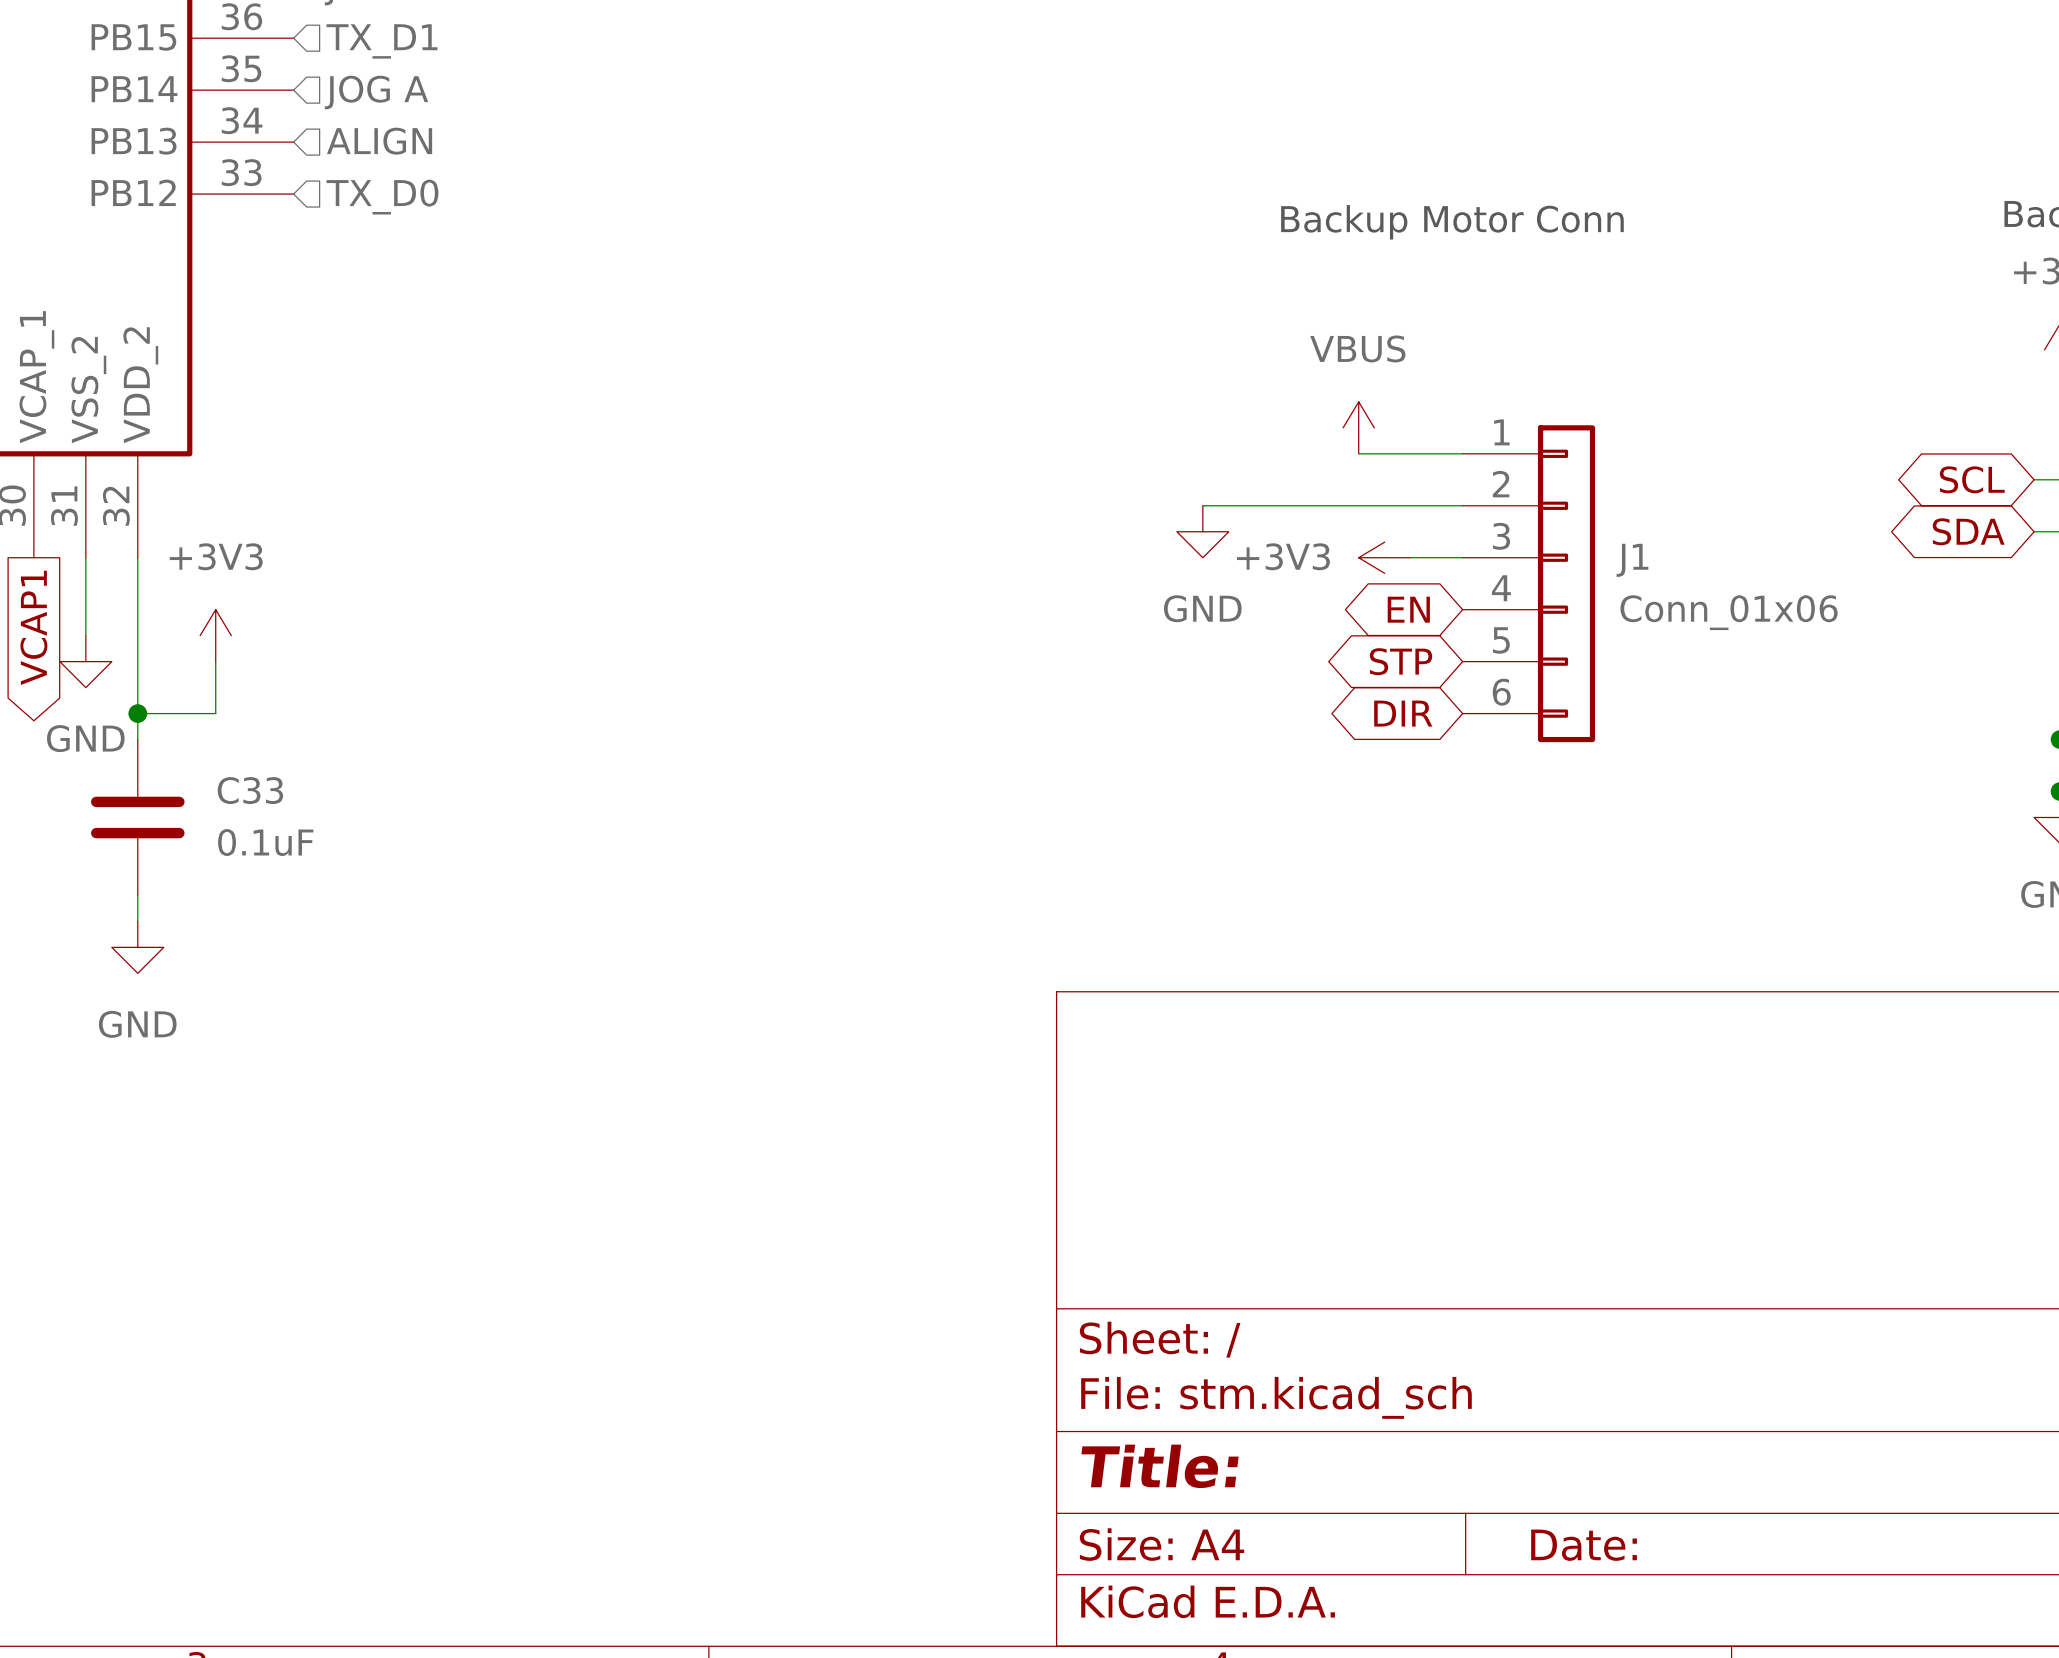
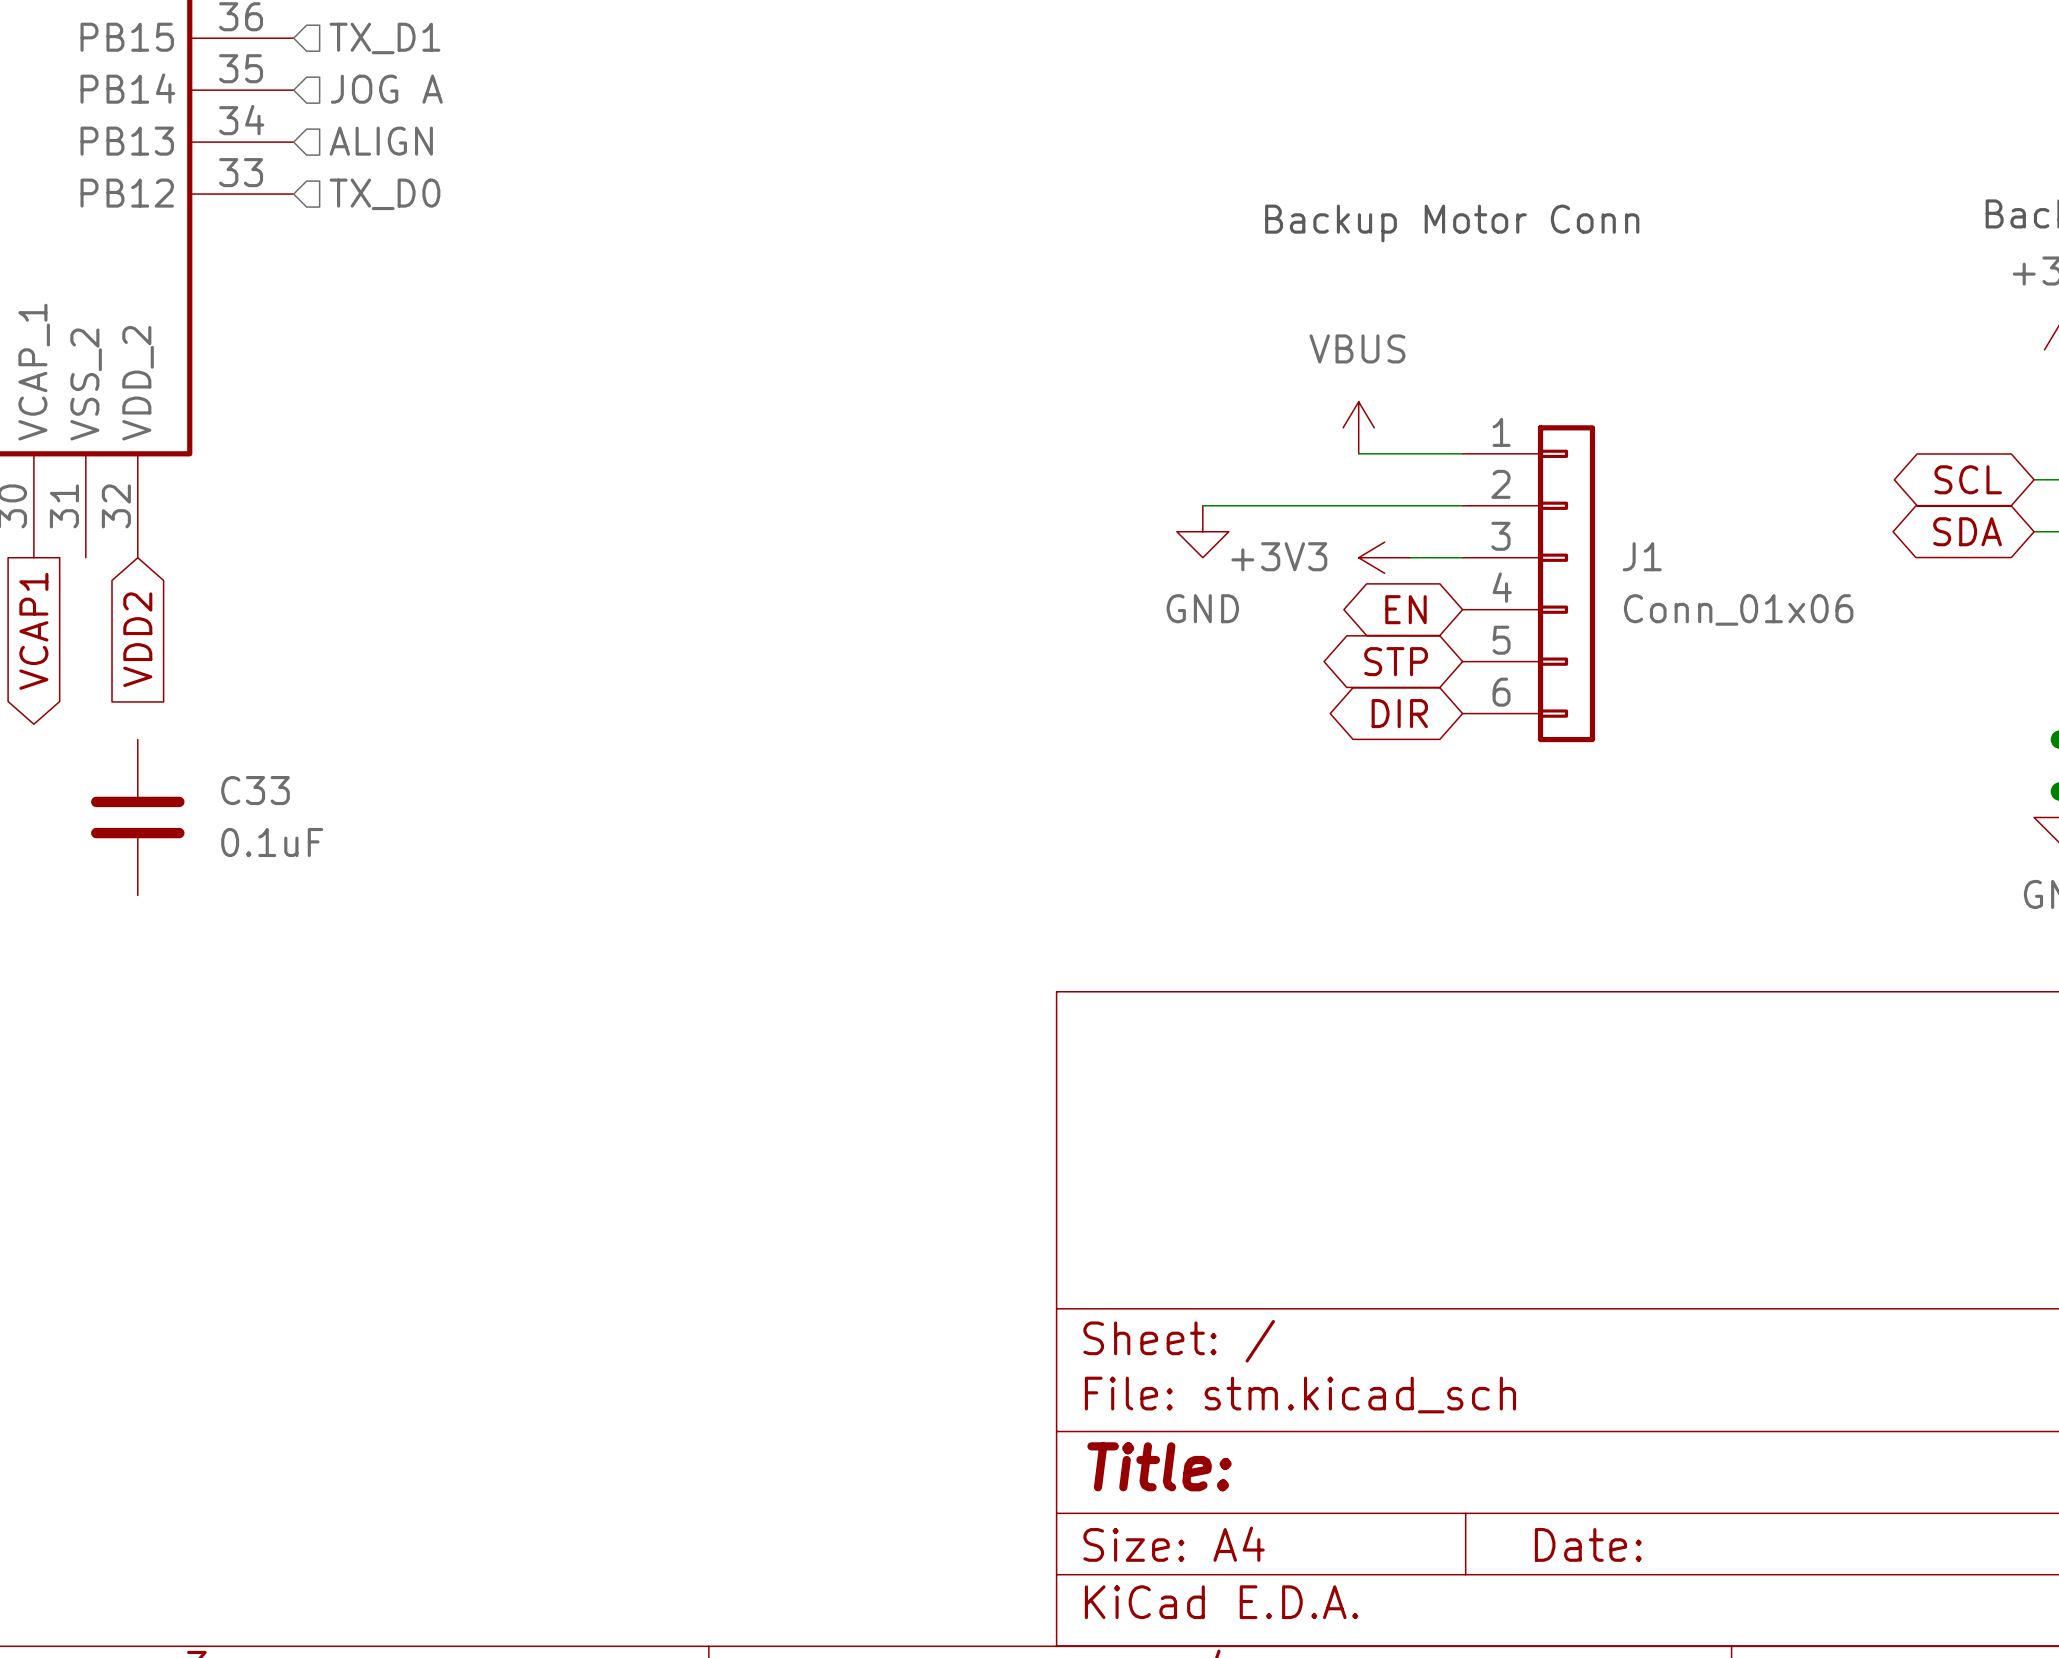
wire: (85, 557) (85, 635) -> none
wire: (137, 557) (137, 739) -> none
power symbol: +3V3 (215, 635) -> none
global label: none -> VDD2 (137, 639)
power symbol: GND (85, 661) -> none
wire: (215, 661) (215, 713) (137, 713) -> none
junction: (137, 713) -> none
wire: (137, 895) (137, 921) -> none
power symbol: GND (137, 947) -> none

